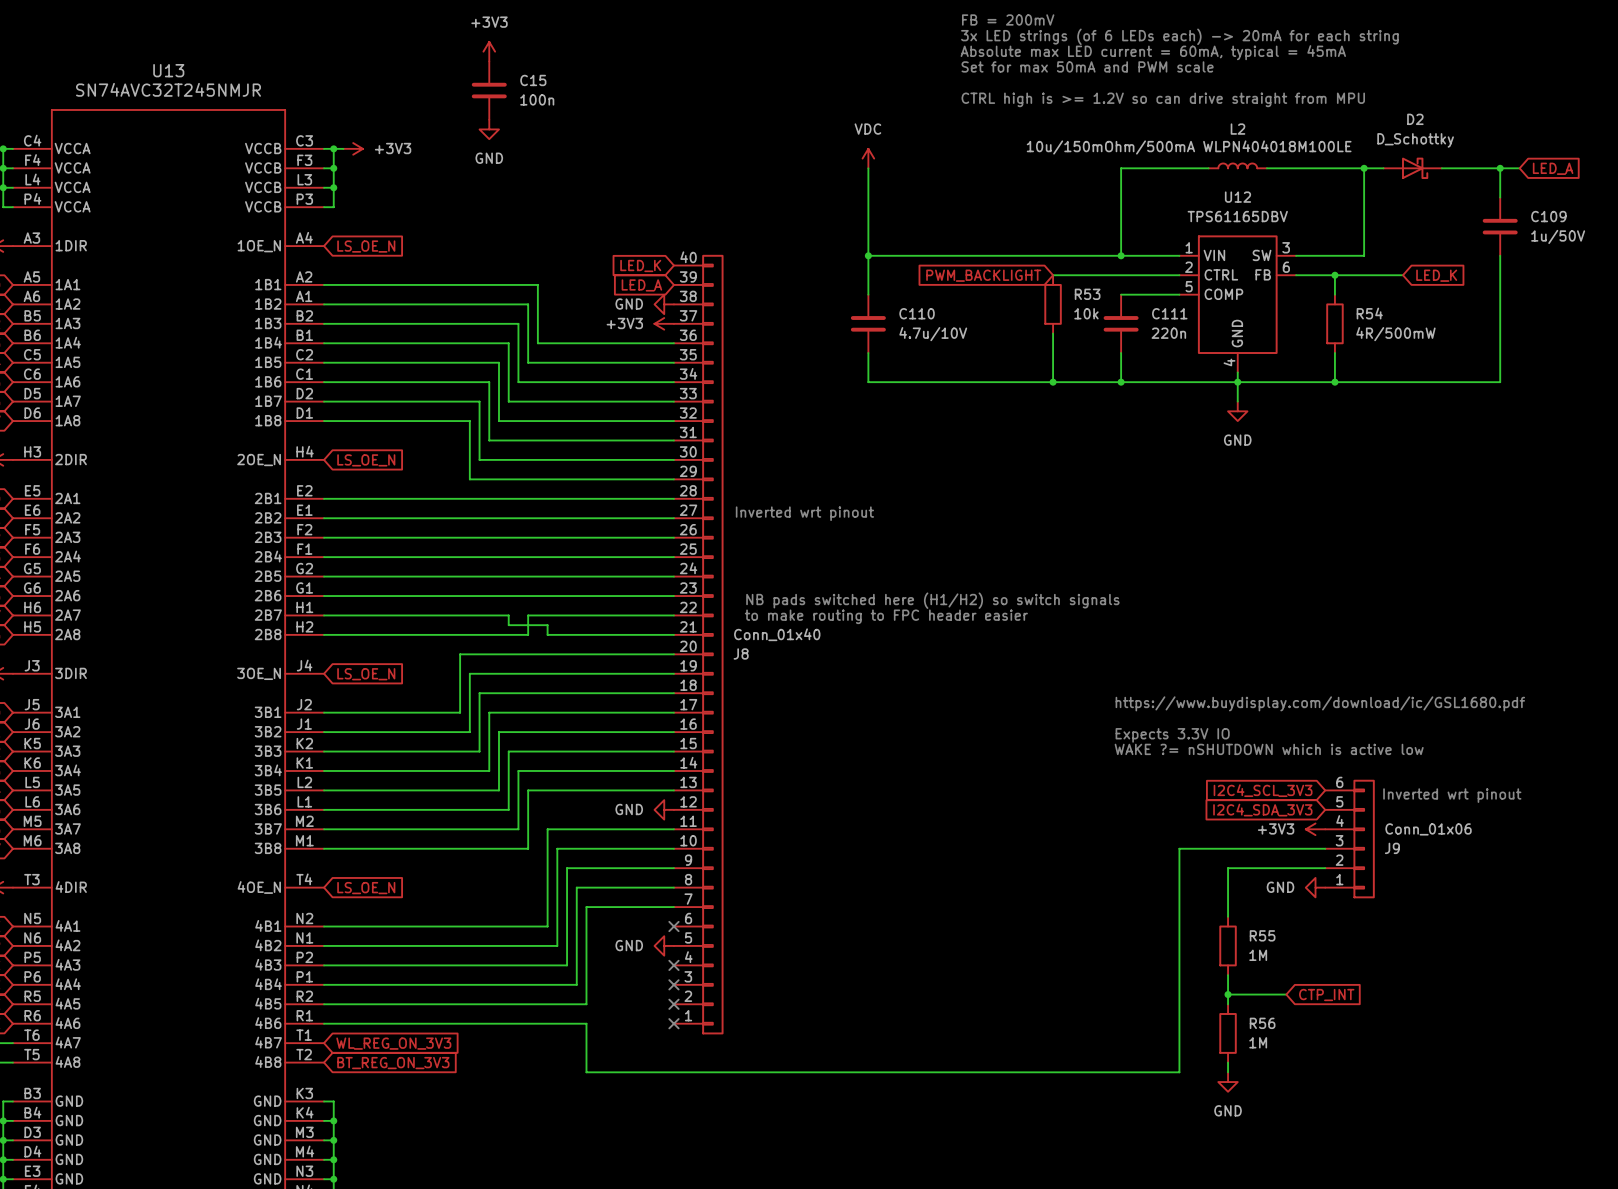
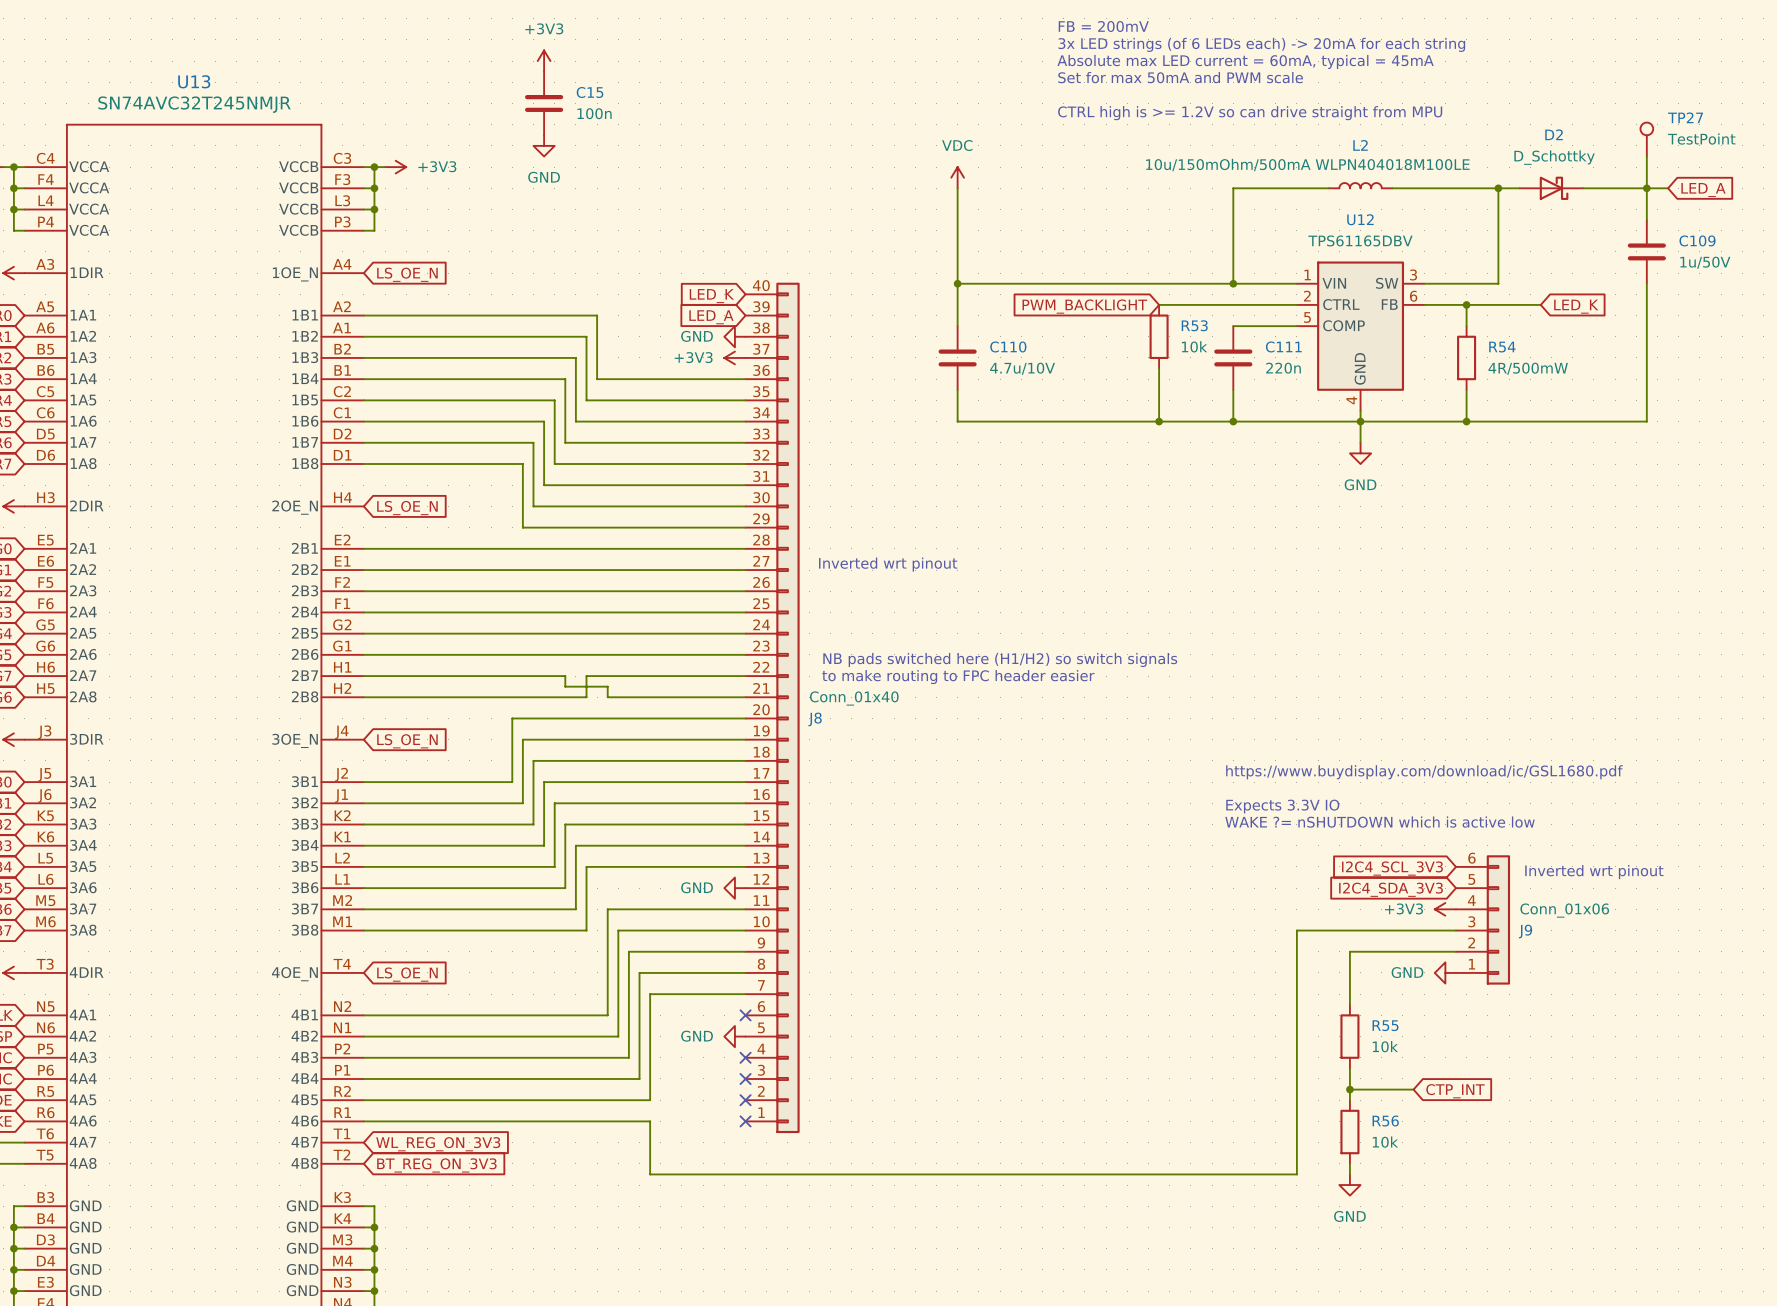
TP27: none -> TestPoint (1646, 139)
wire: none -> (1646, 156) (1646, 188)
R55 value: 1M (1258, 955) -> 10k (1385, 1046)
R56 value: 1M (1258, 1042) -> 10k (1385, 1142)

